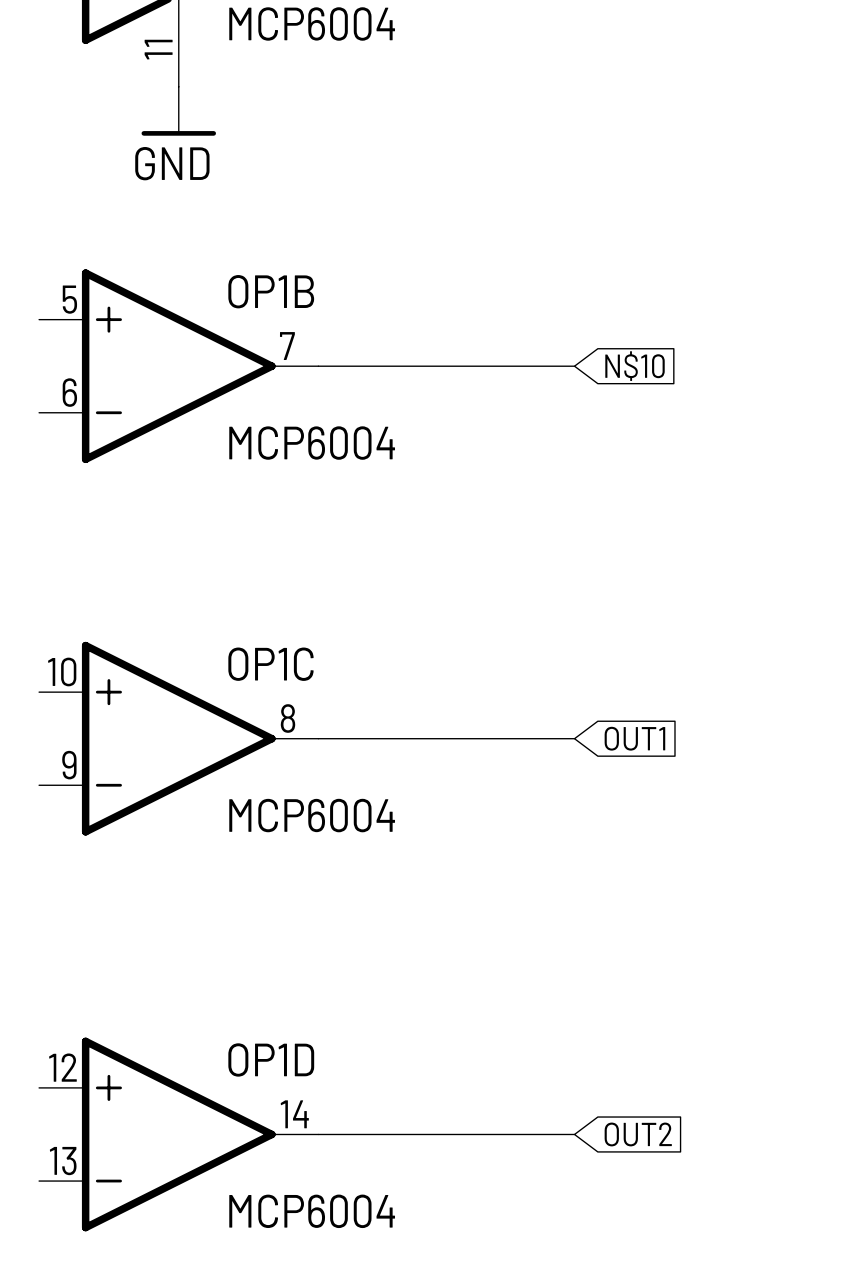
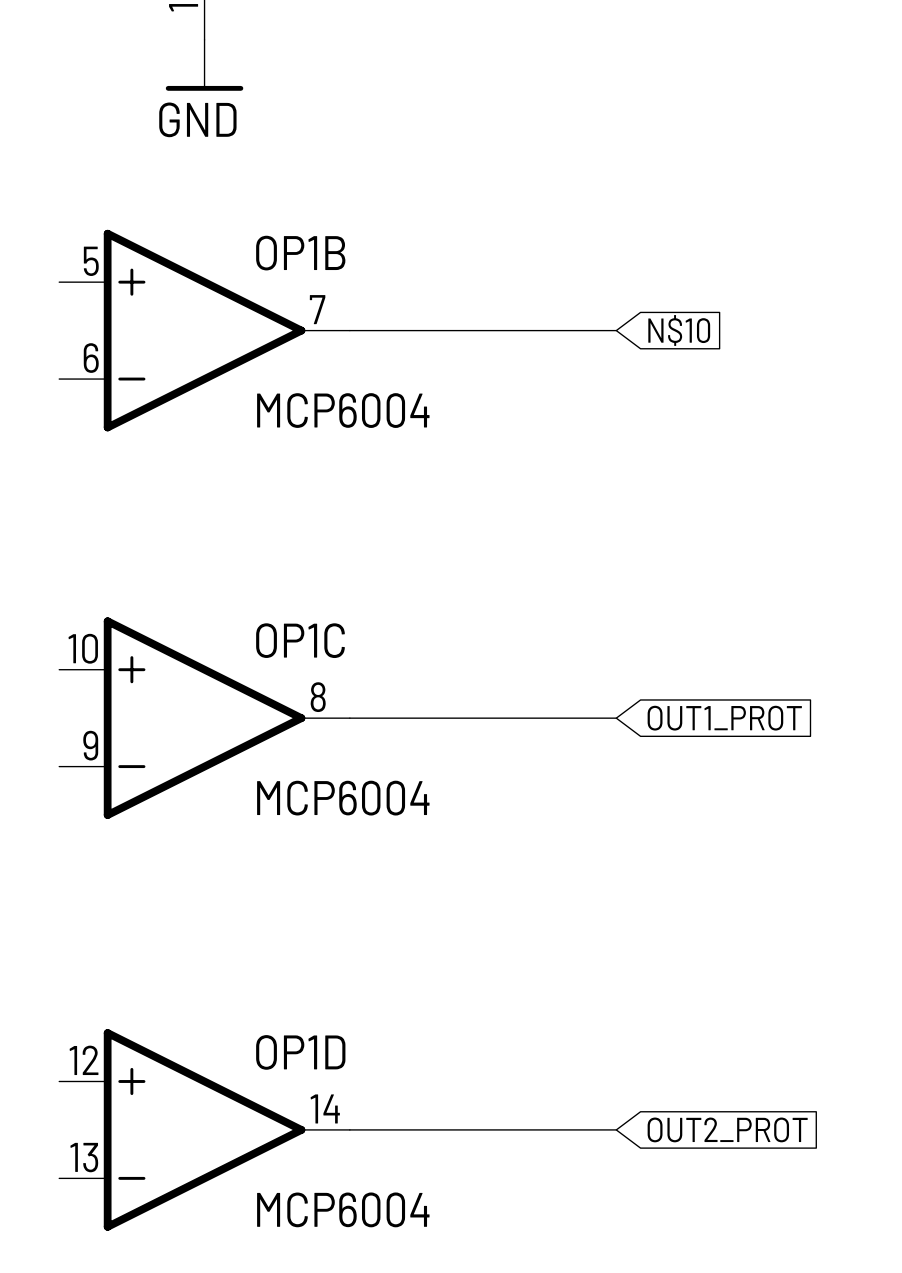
global label: OUT1 (634, 738) -> OUT1_PROT (724, 718)
global label: OUT2 (638, 1134) -> OUT2_PROT (727, 1129)

